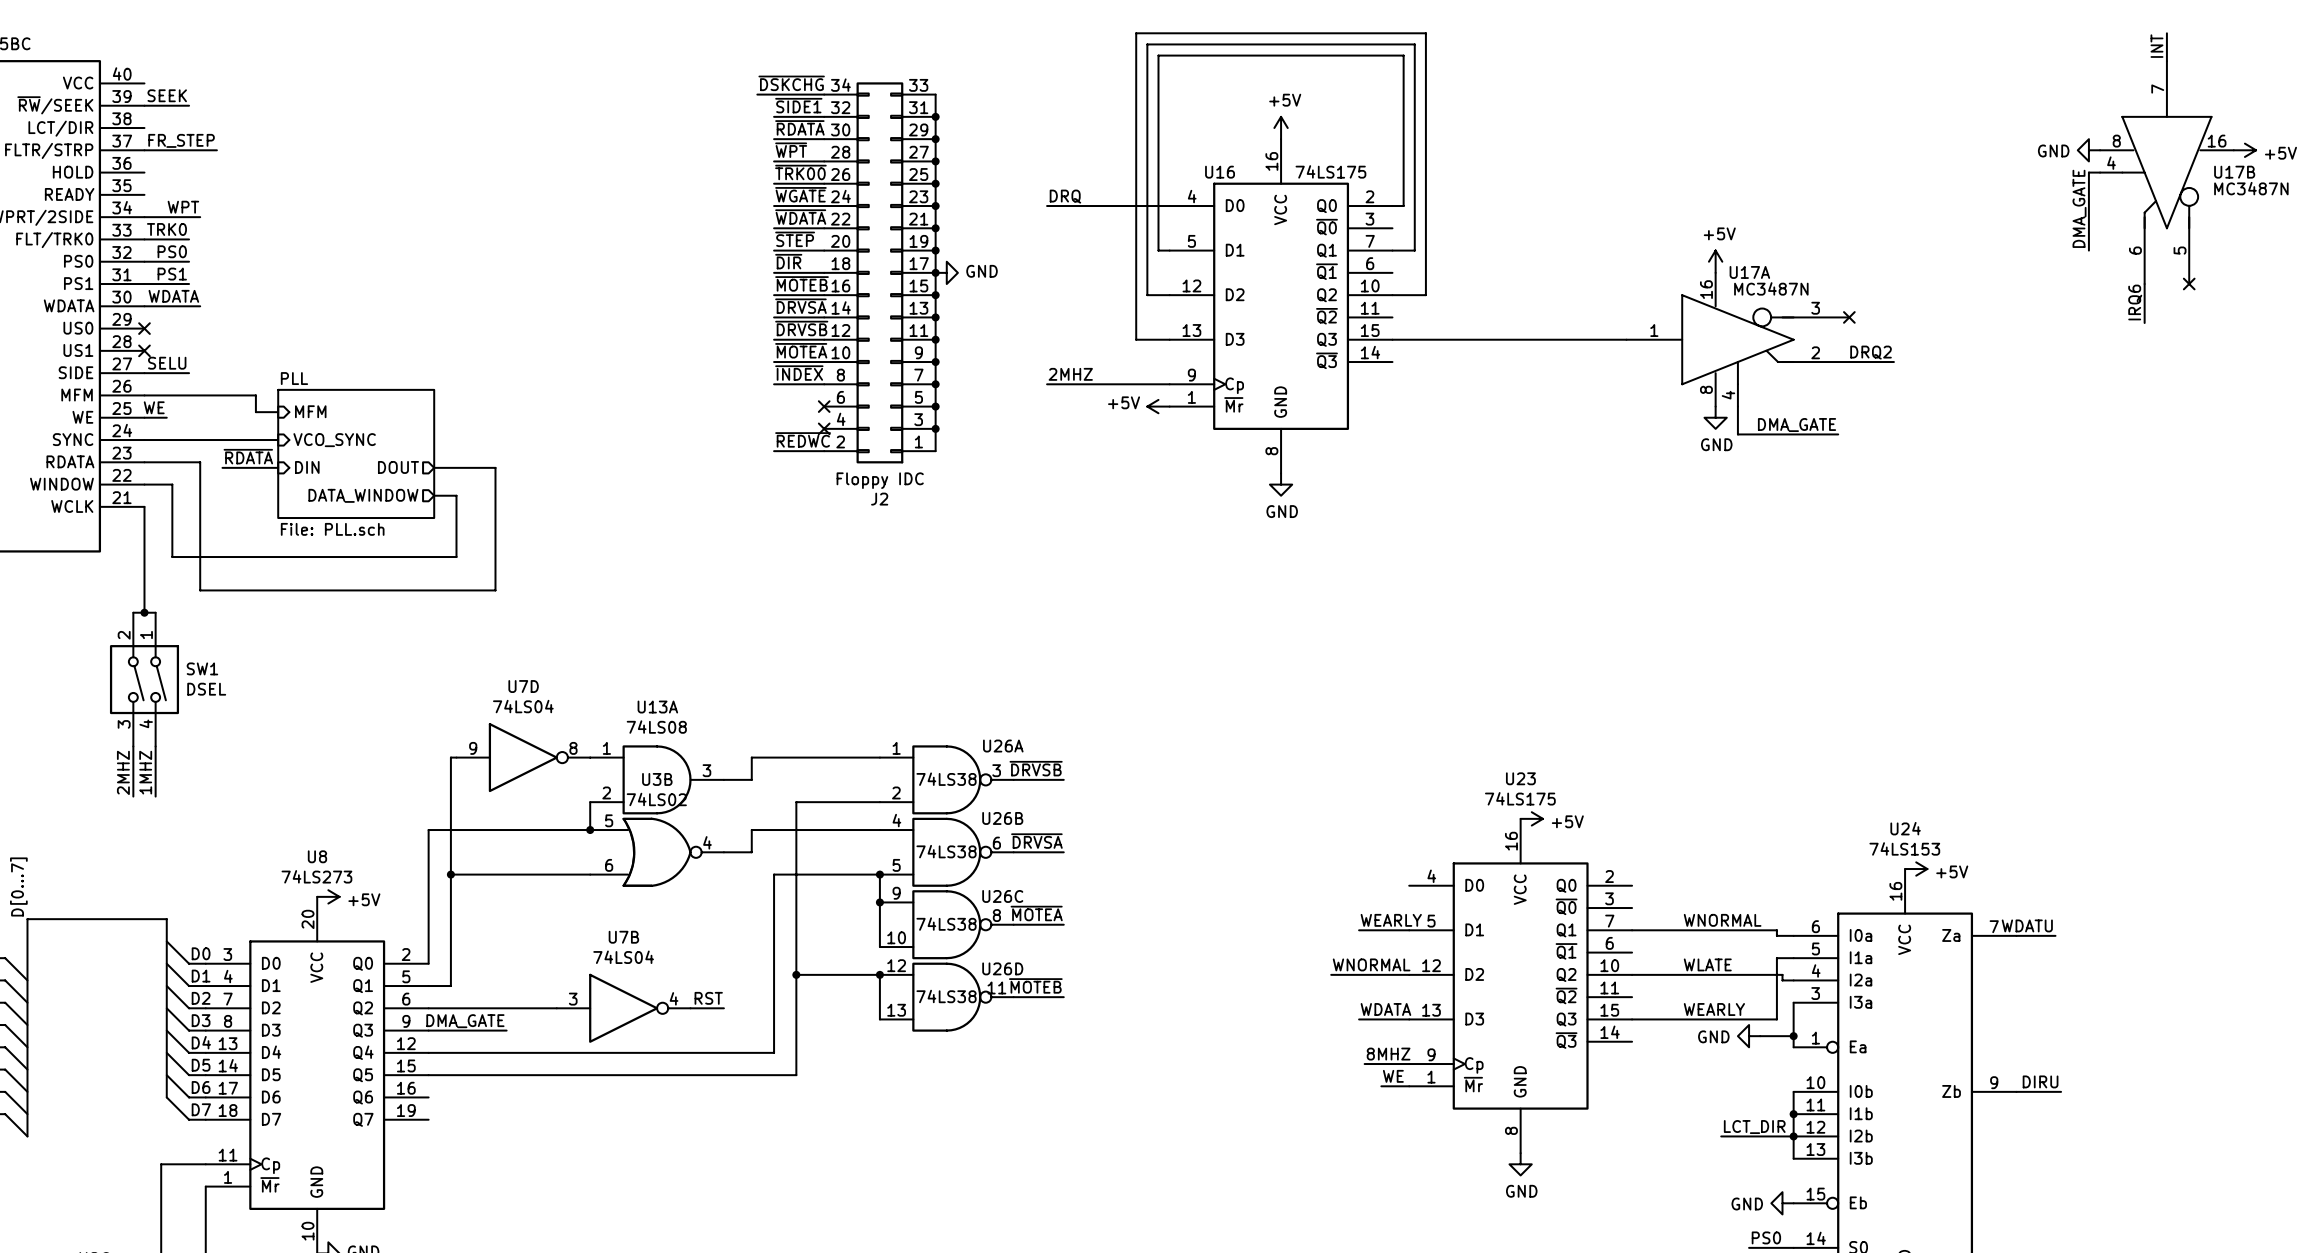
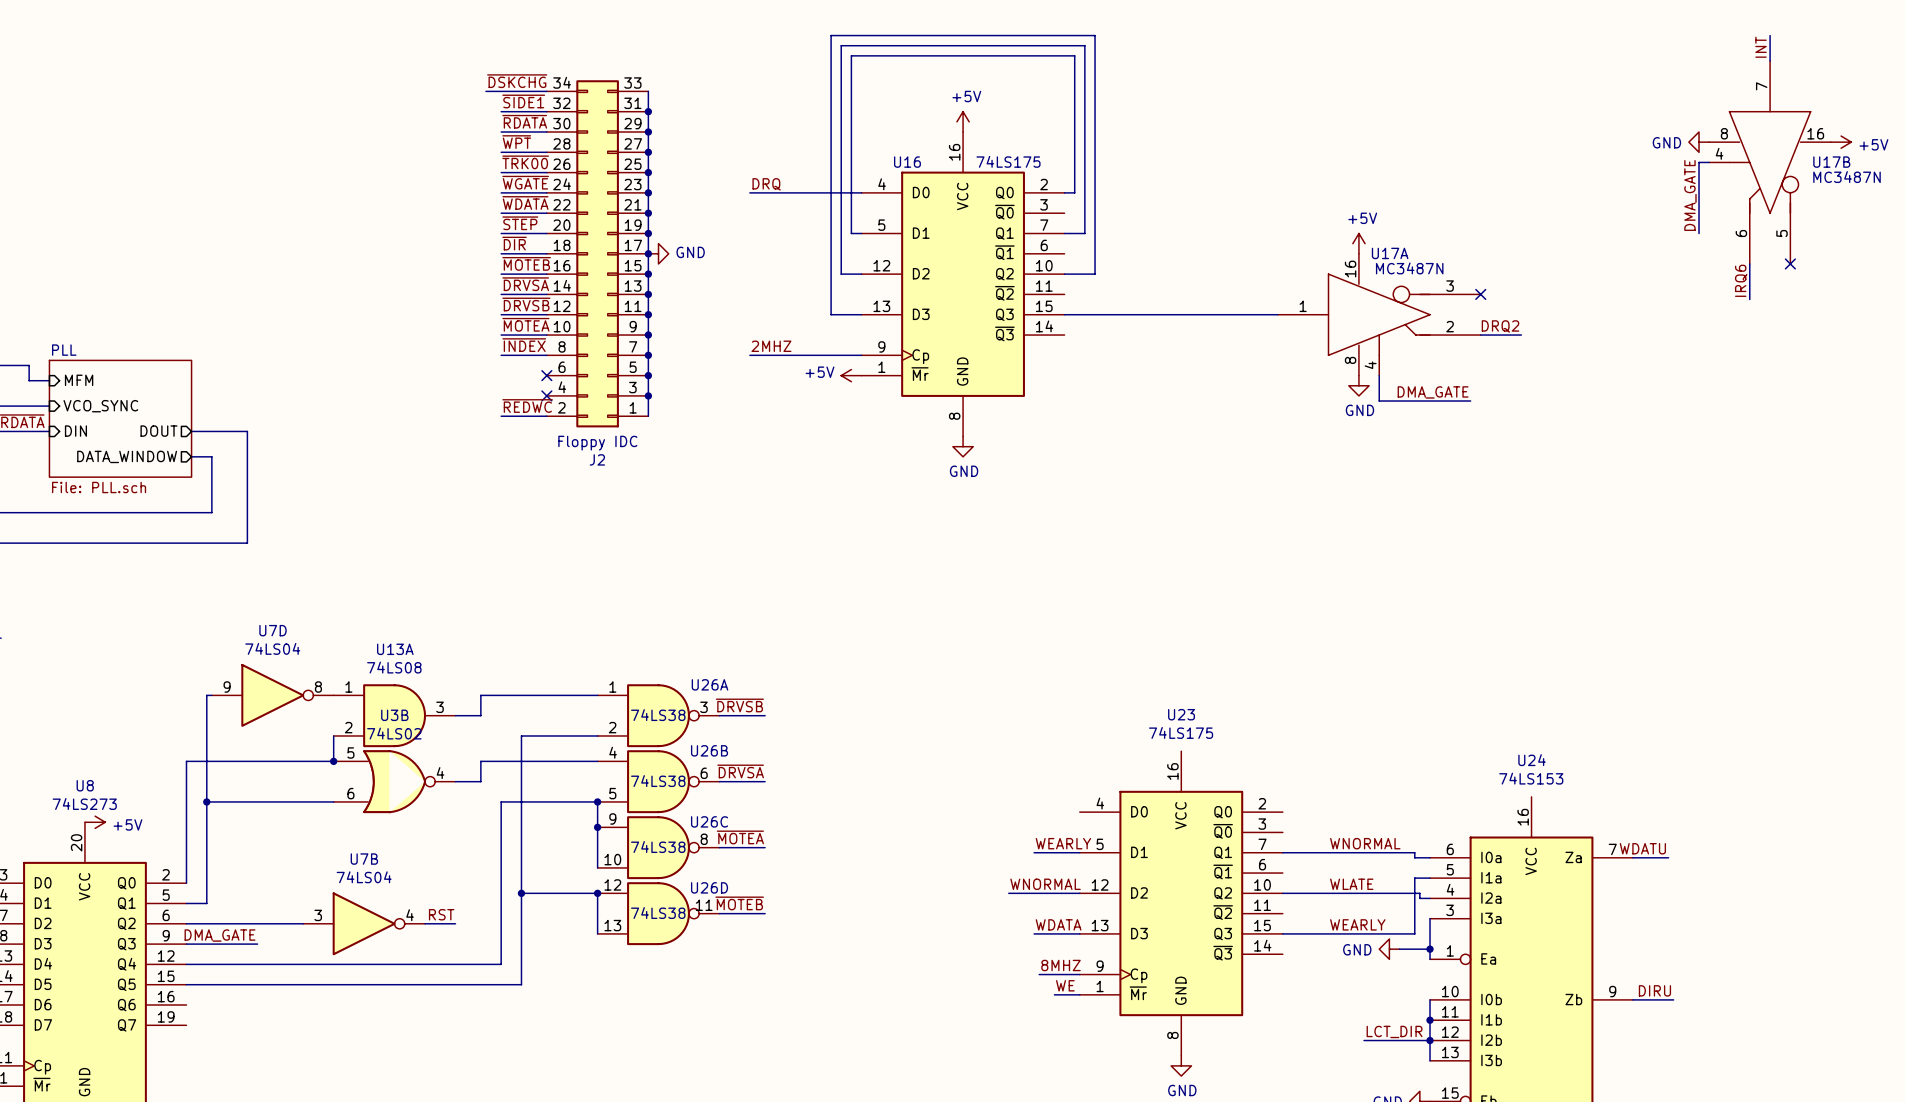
power symbol: +5V (1531, 818) -> none
power symbol: +5V (1916, 869) -> none

